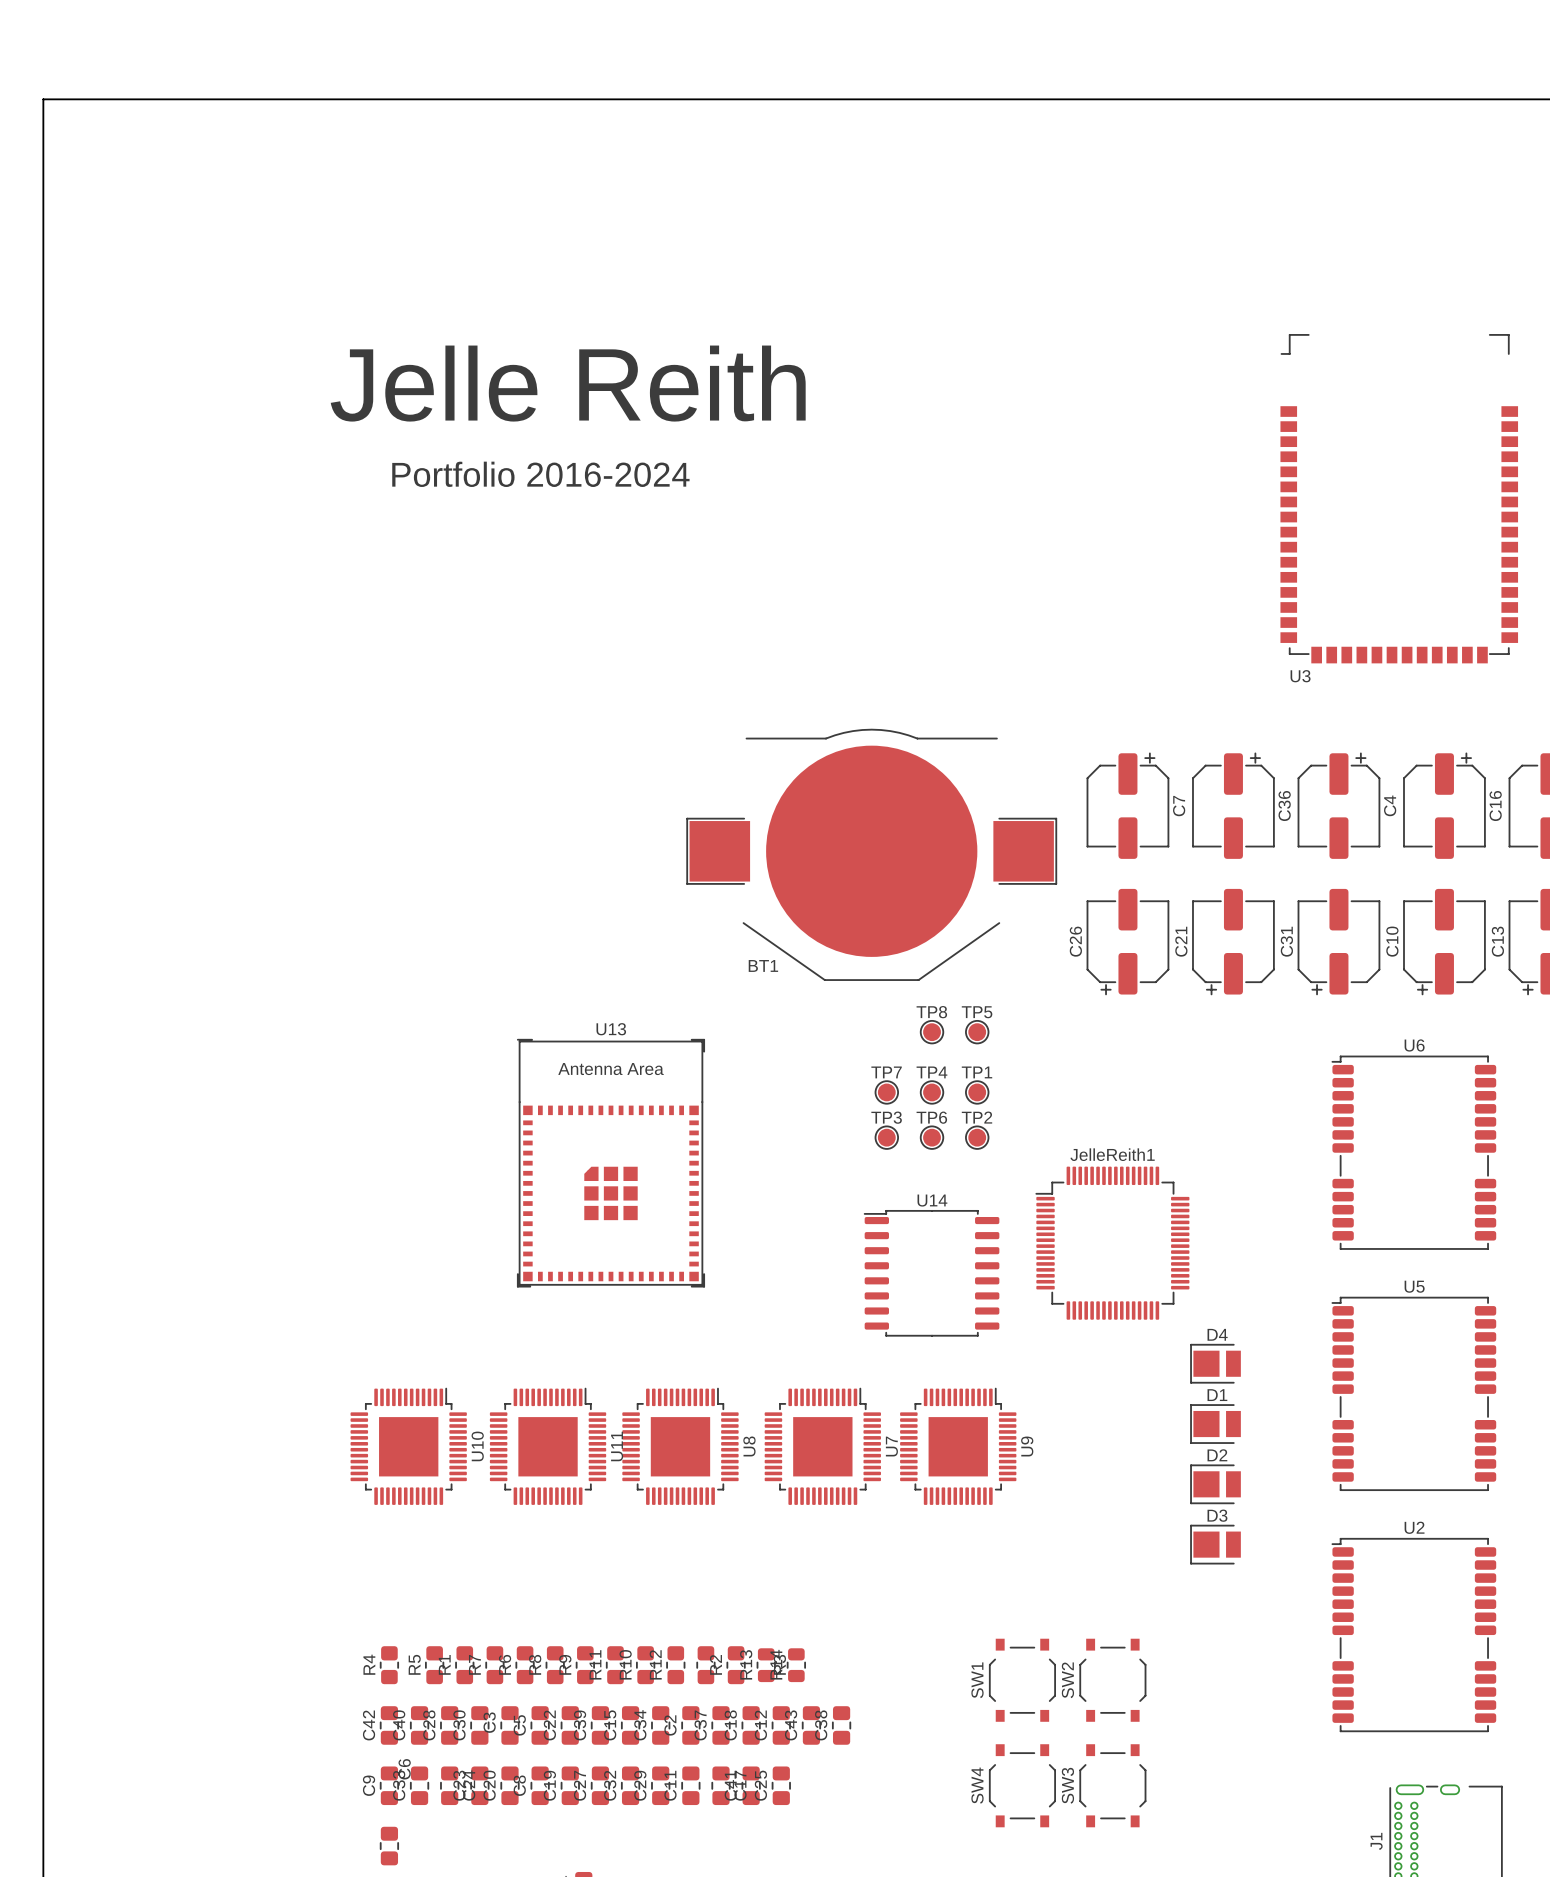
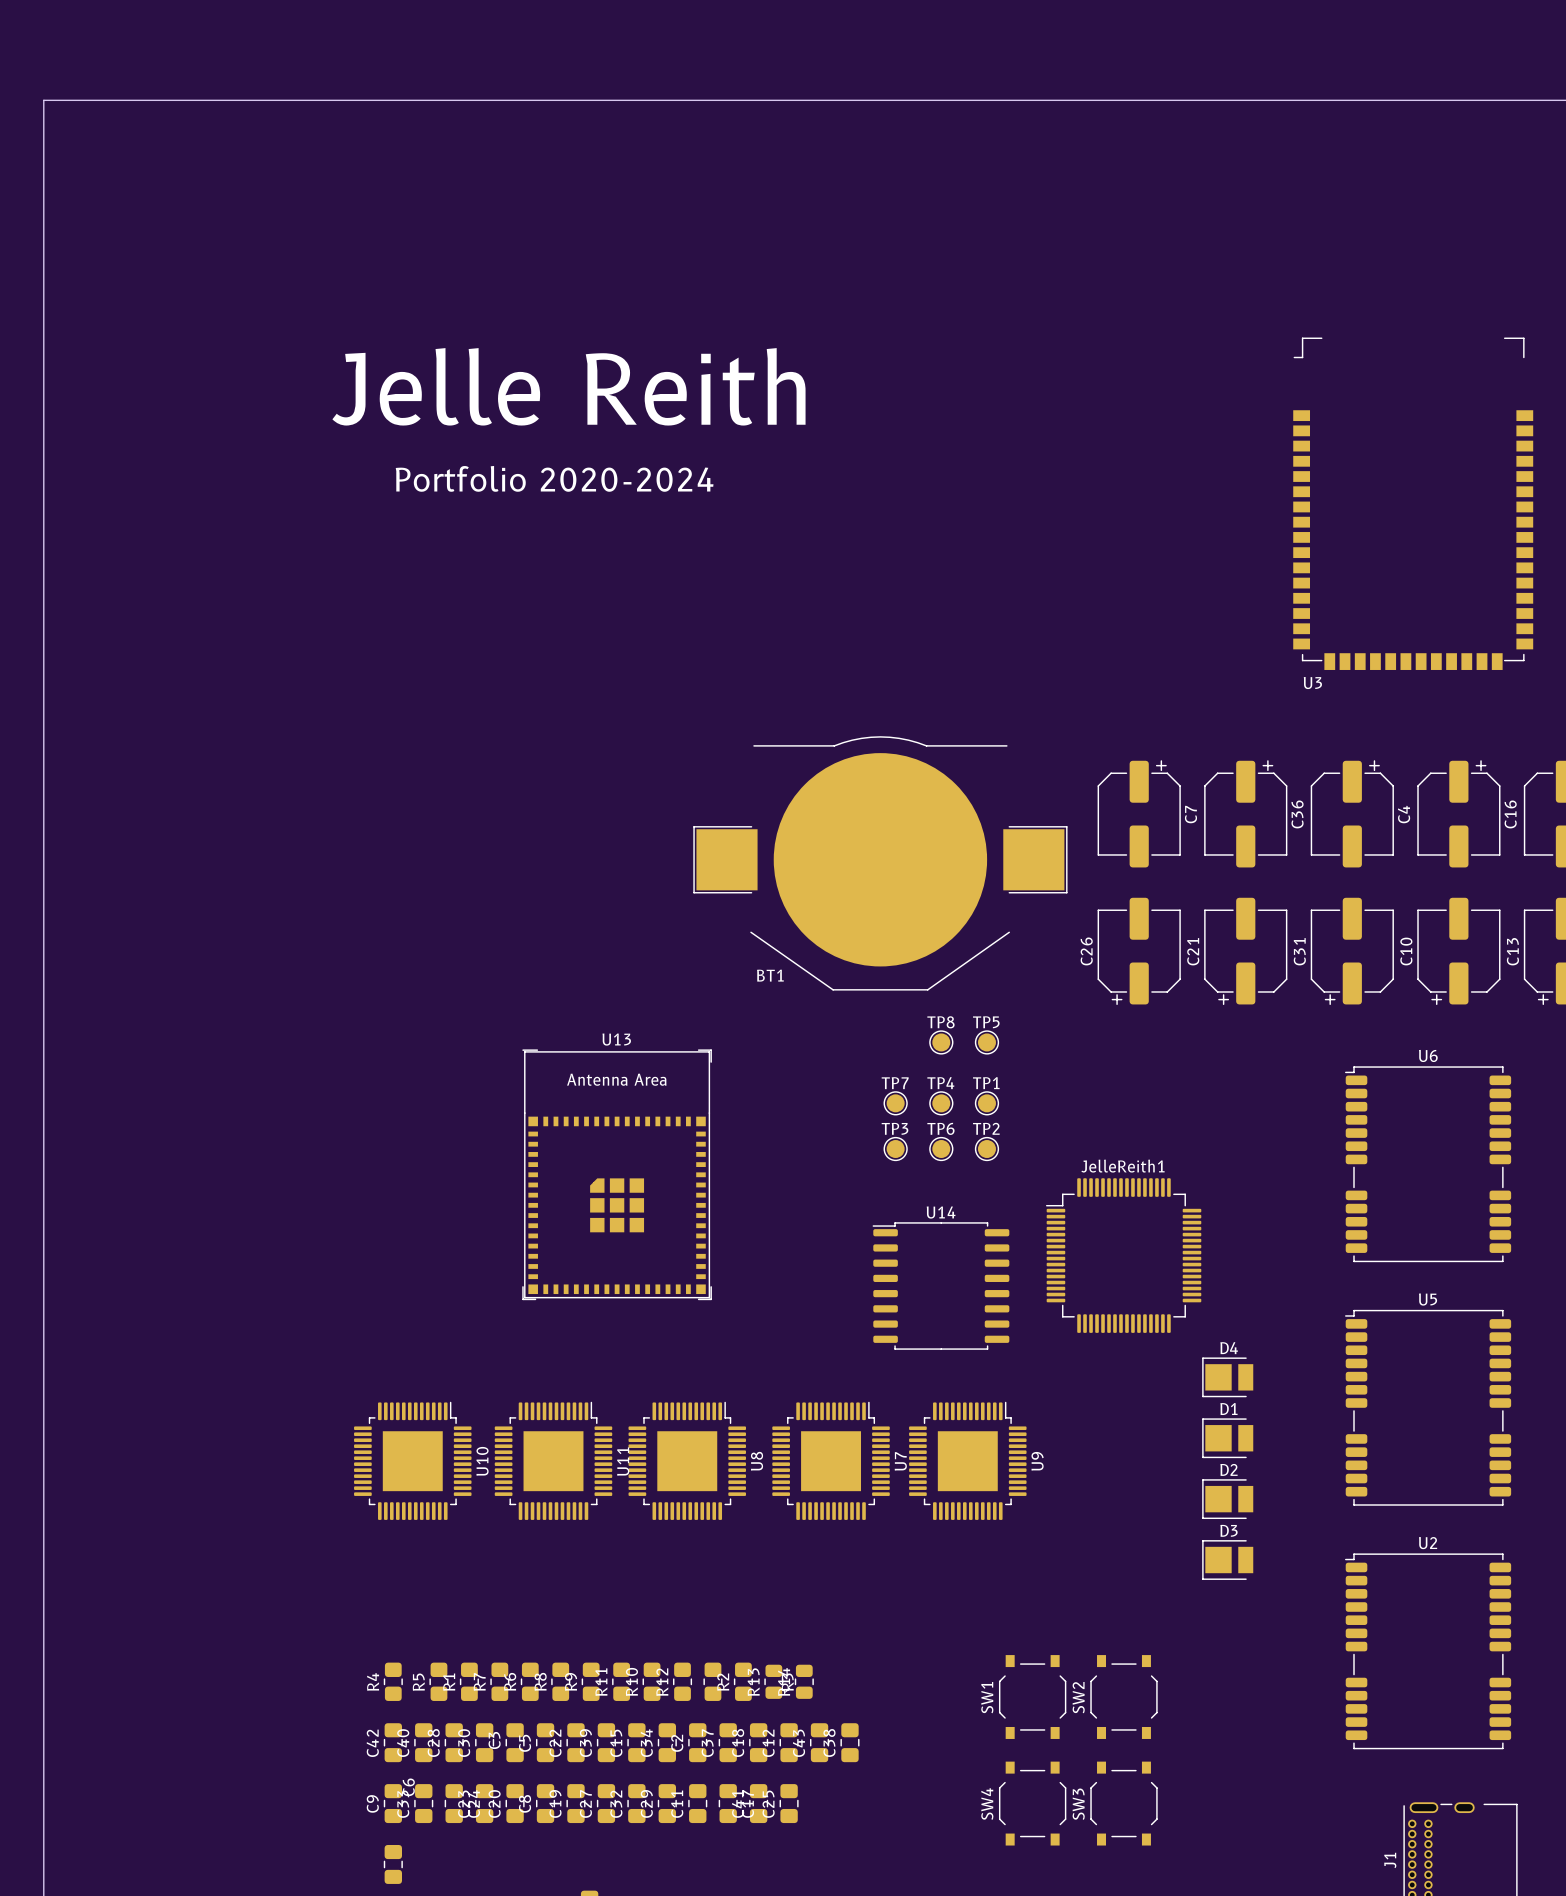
text: Portfolio 2016-2024 (540, 474) -> Portfolio 2020-2024 (554, 478)

